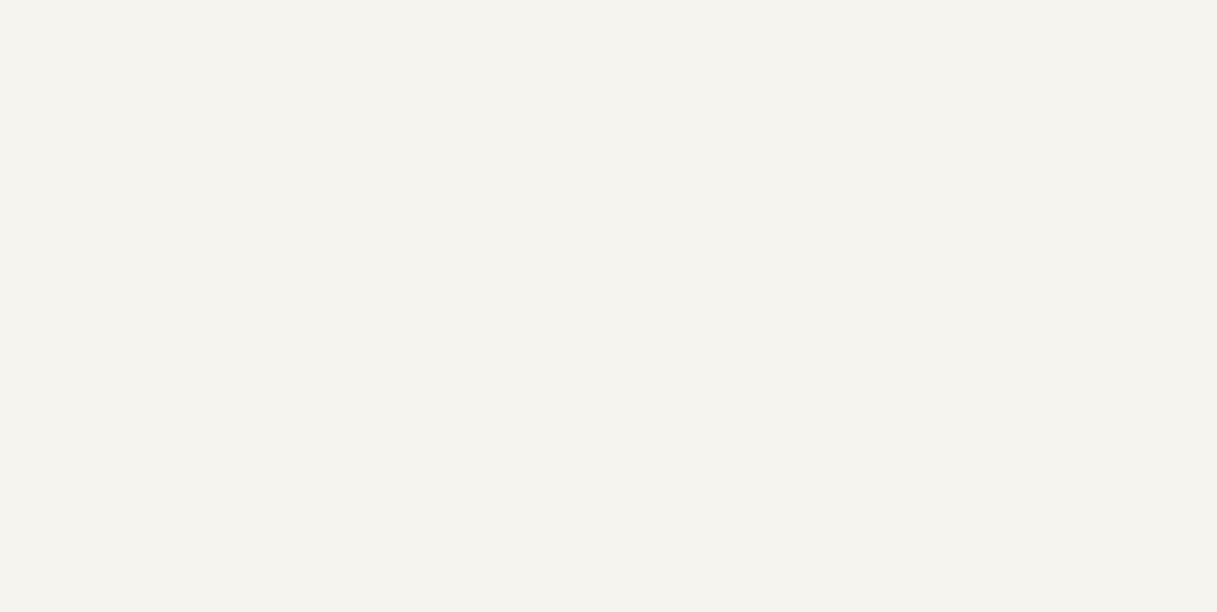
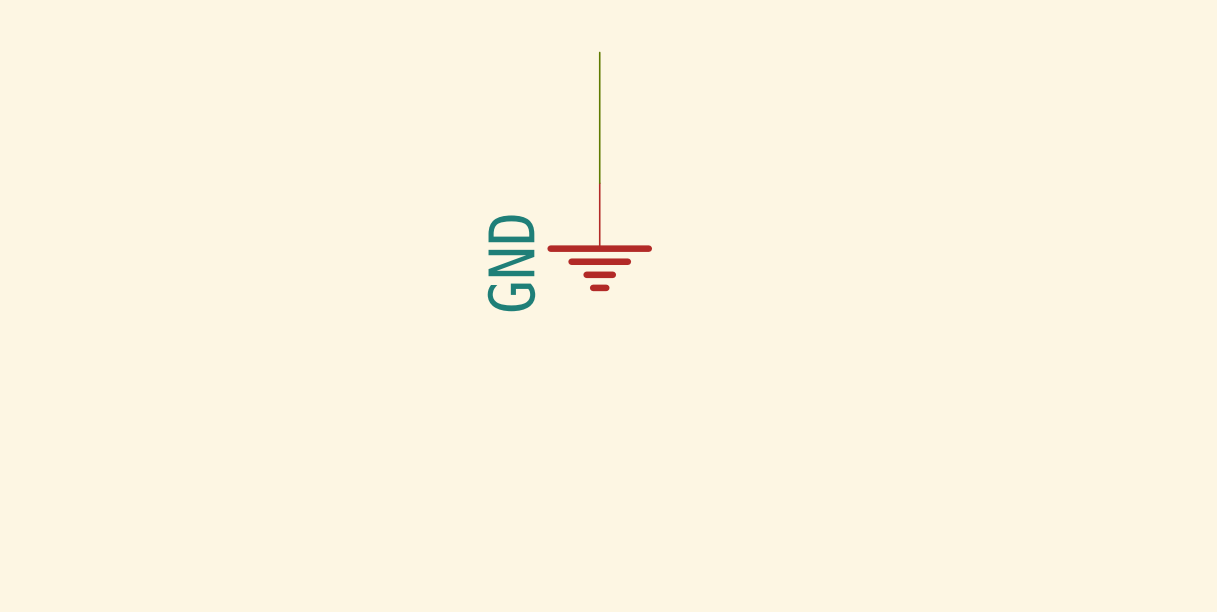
wire: none -> (599, 52) (599, 183)
power symbol: none -> (599, 237)

